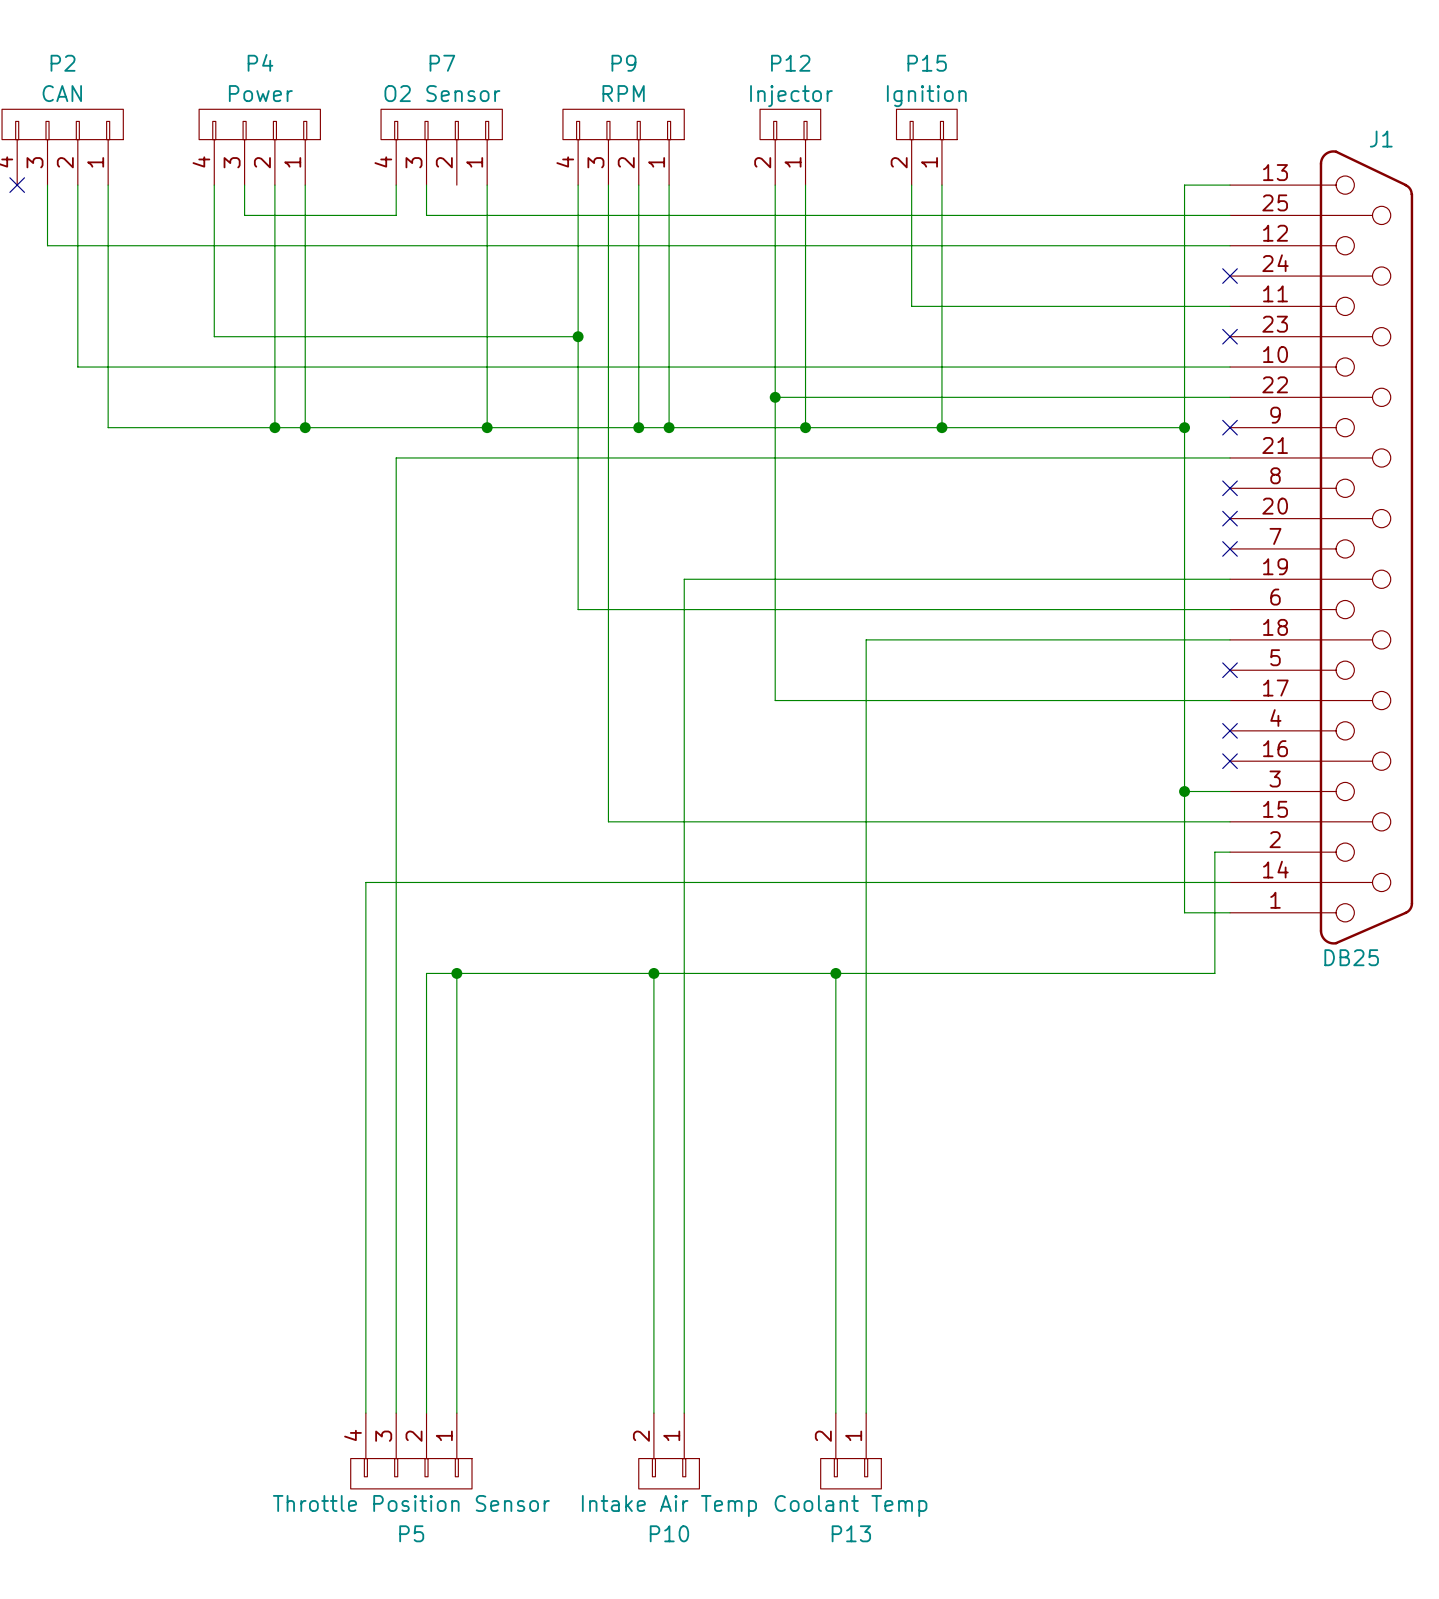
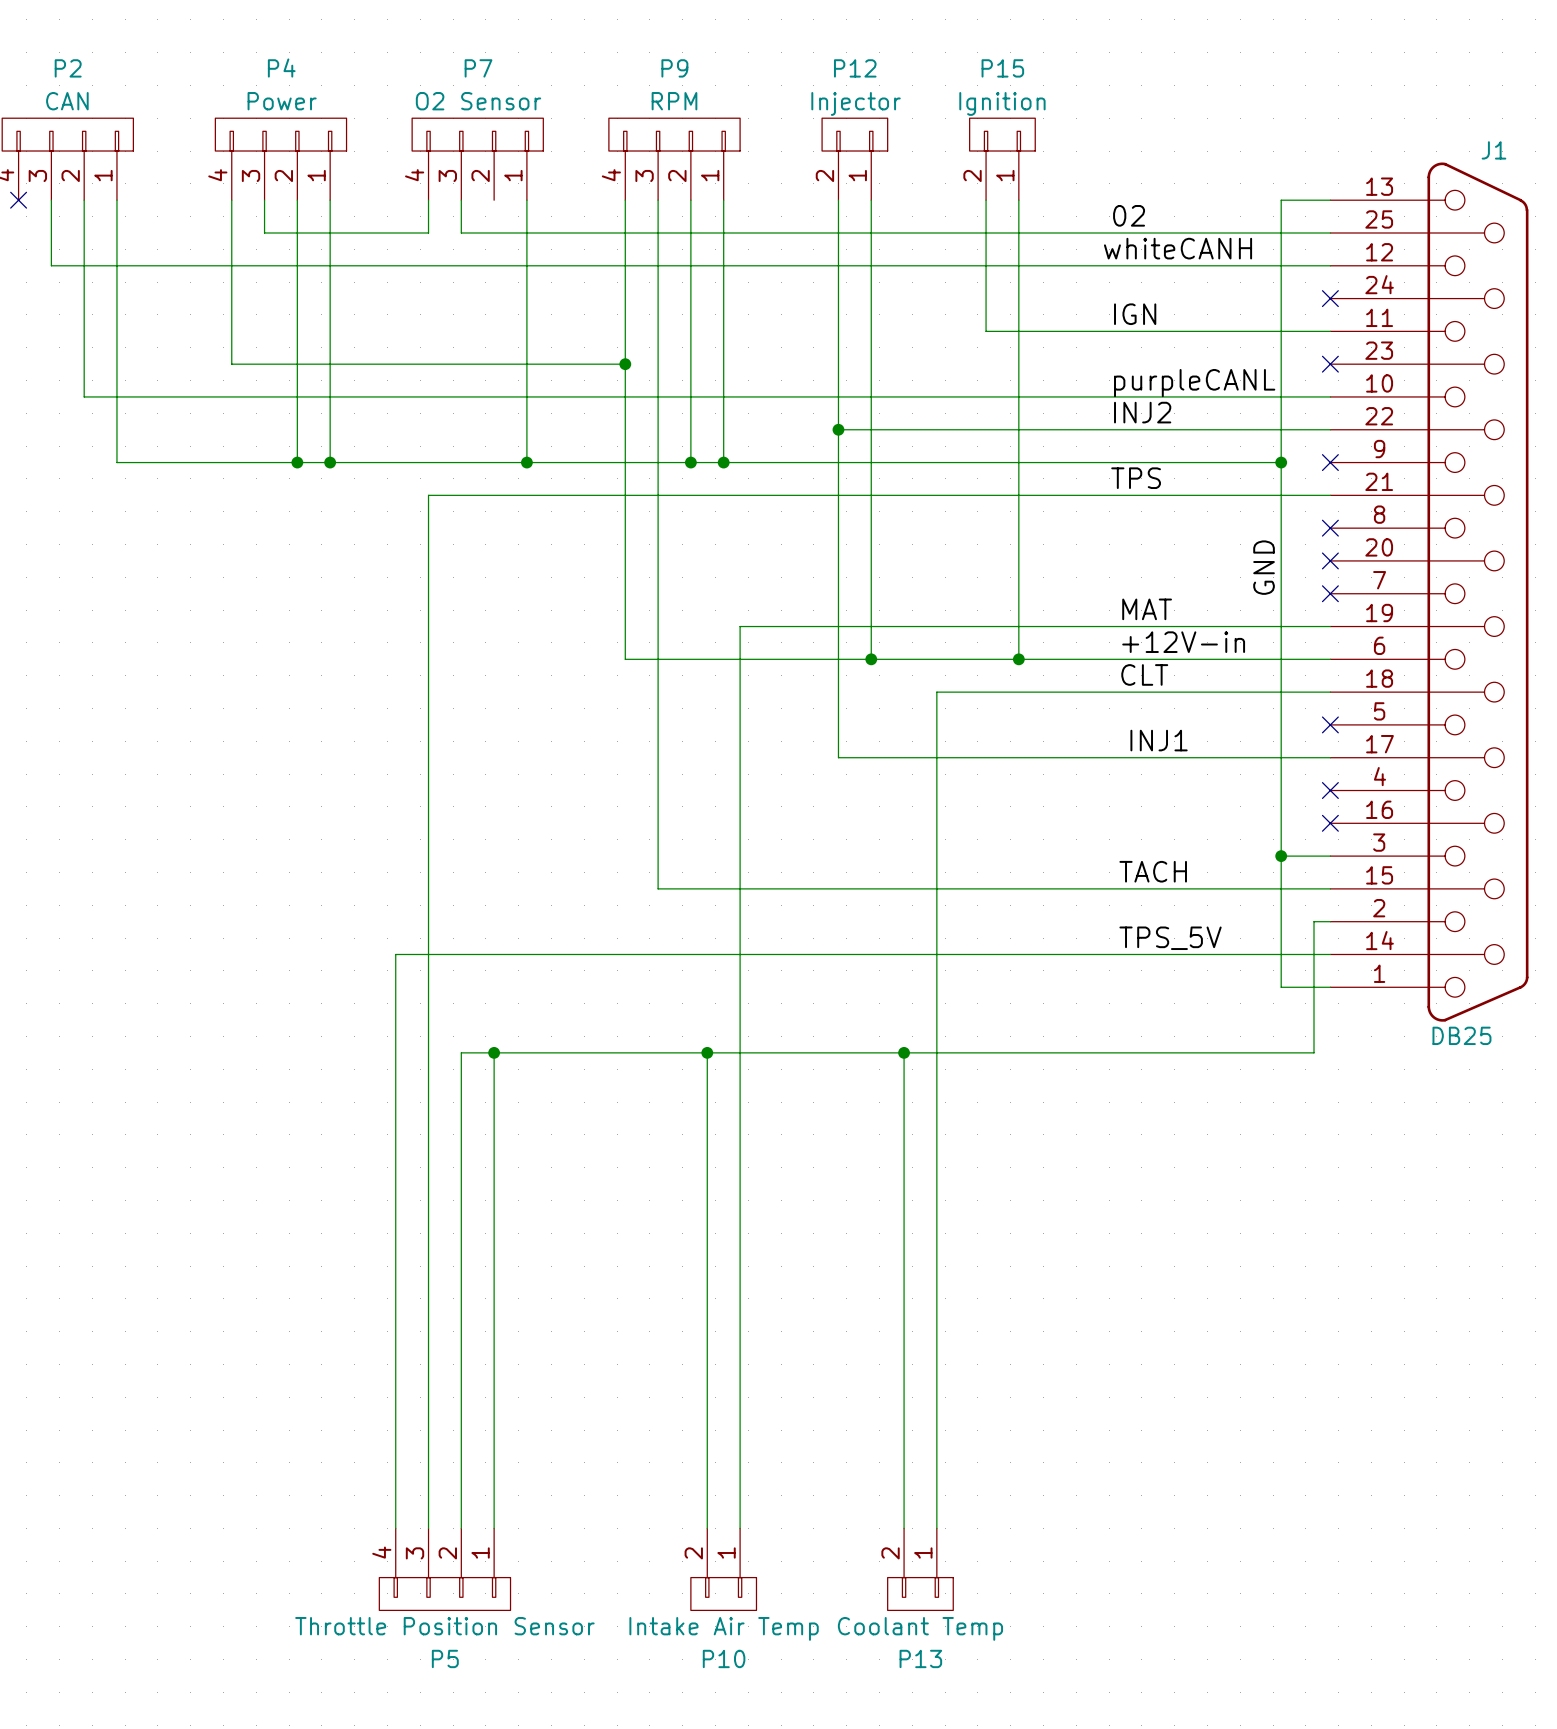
label: none -> 02 (1129, 215)
label: none -> whiteCANH (1178, 248)
label: none -> IGN (1135, 314)
label: none -> purpleCANL (1194, 383)
label: none -> INJ2 (1142, 412)
wire: none -> (871, 462) (871, 659)
junction: (805, 427) -> none
wire: none -> (1018, 462) (1018, 659)
junction: (941, 427) -> none
label: none -> TPS (1136, 478)
label: none -> GND (1264, 567)
label: none -> MAT (1147, 609)
label: none -> +12V-in (1183, 642)
junction: none -> (871, 659)
junction: none -> (1018, 659)
label: none -> CLT (1144, 674)
label: none -> INJ1 (1159, 740)
label: none -> TACH (1153, 871)
label: none -> TPS_5V (1170, 938)

